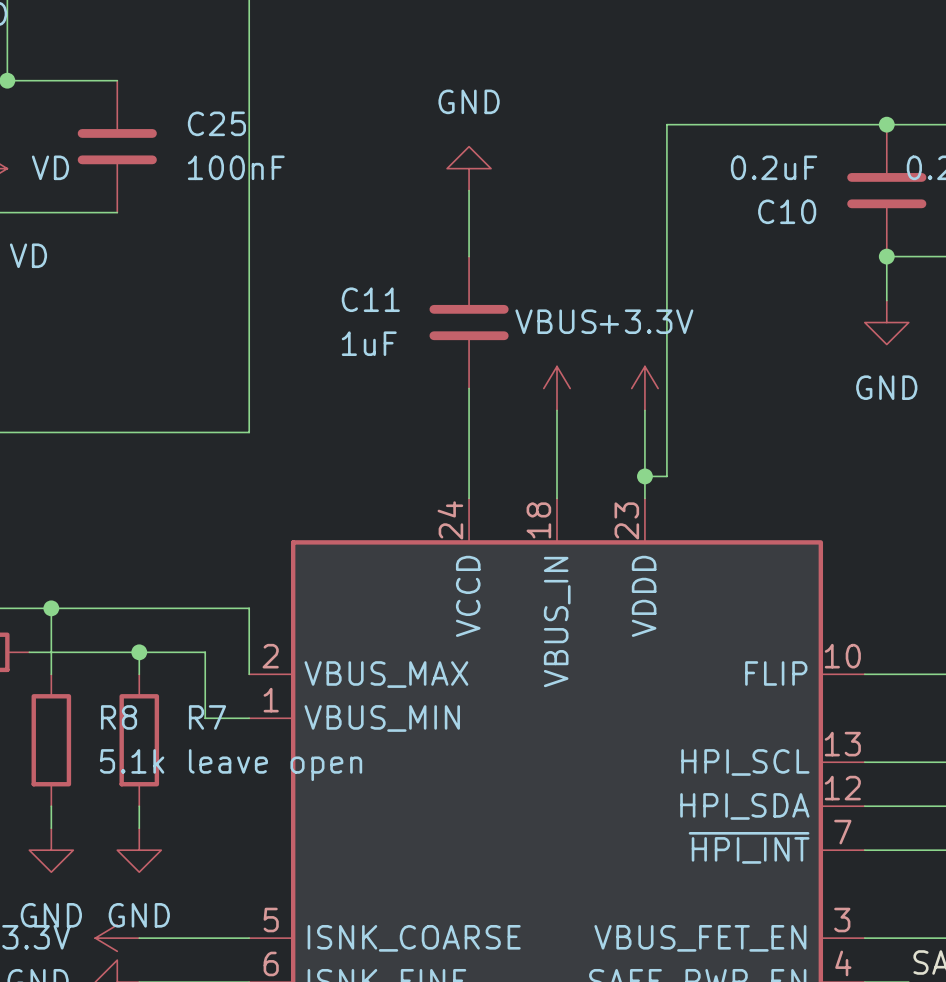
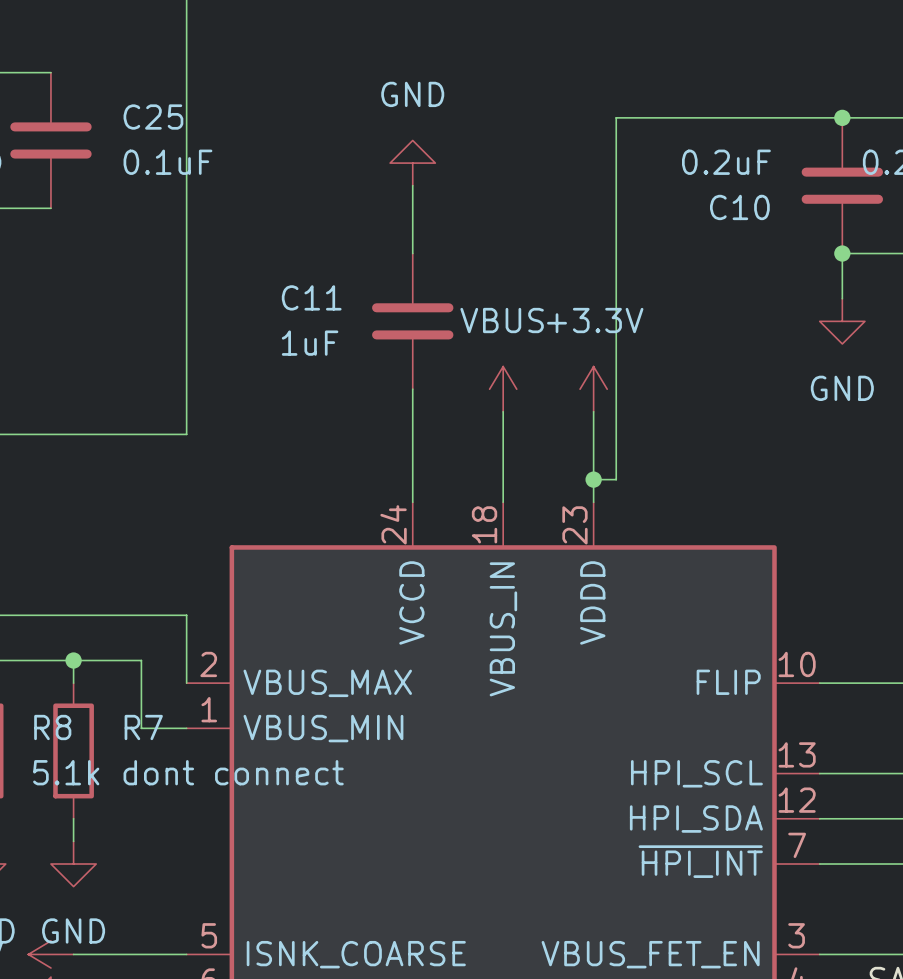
C25 value: 100nF (236, 167) -> 0.1uF (167, 162)
R7 value: leave open (275, 765) -> dont connect (233, 772)

